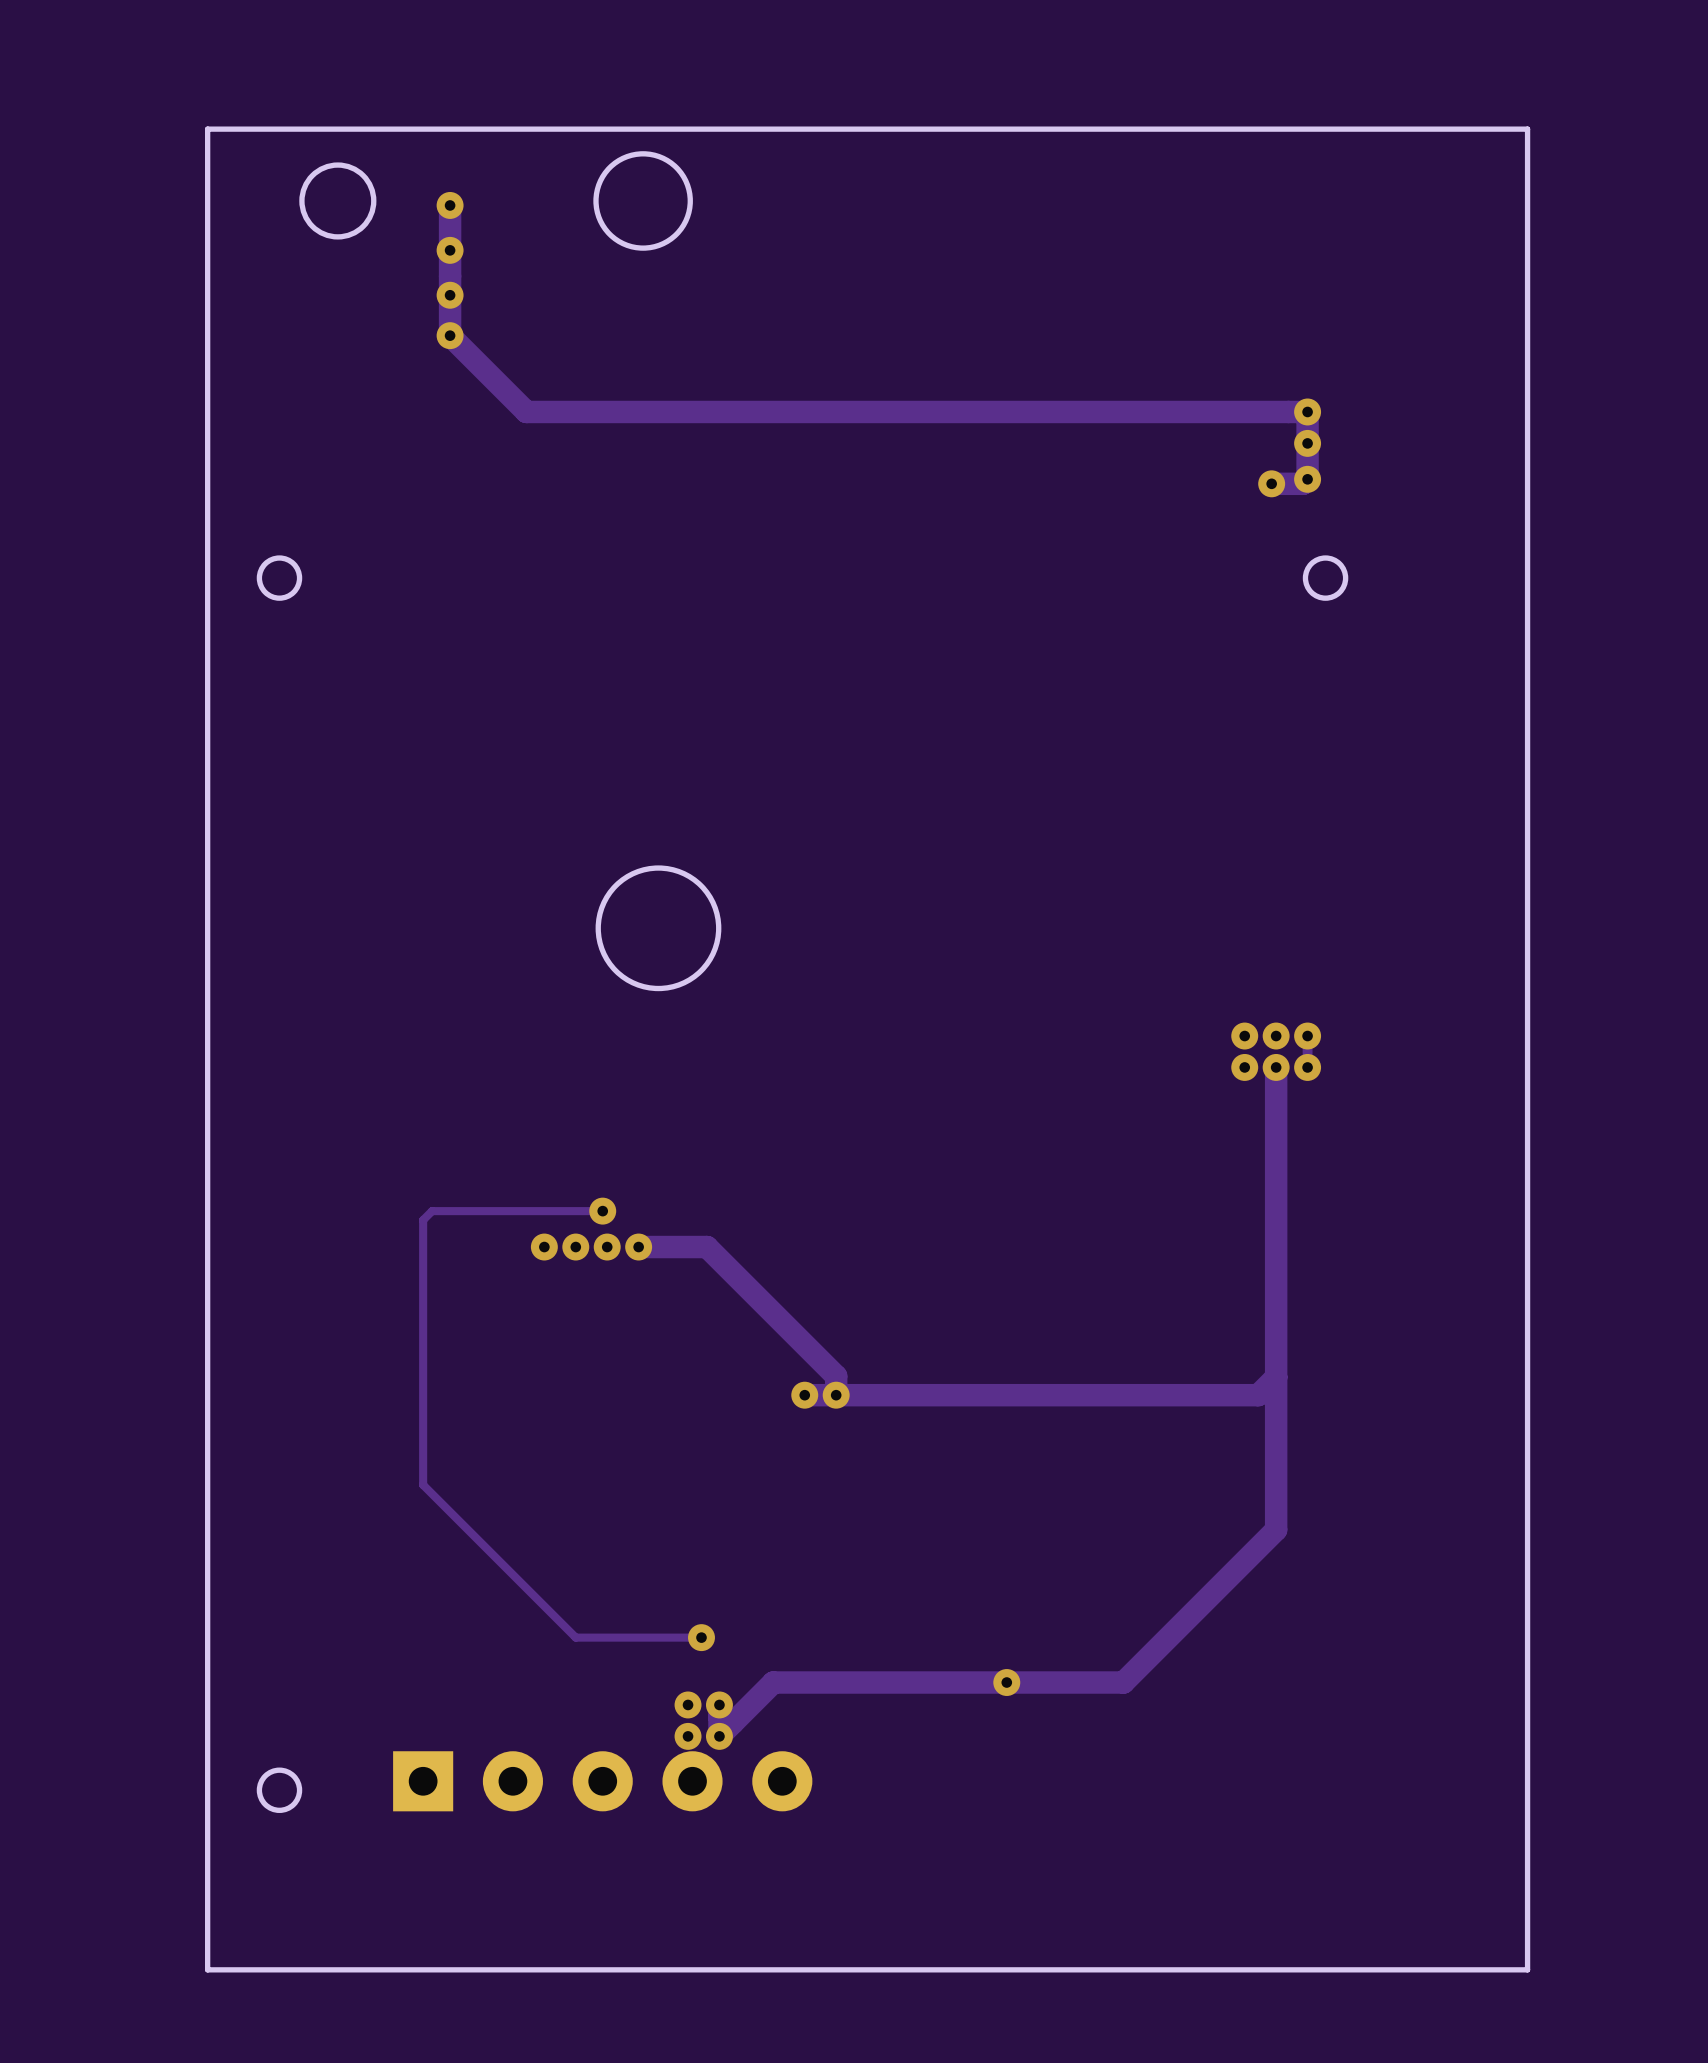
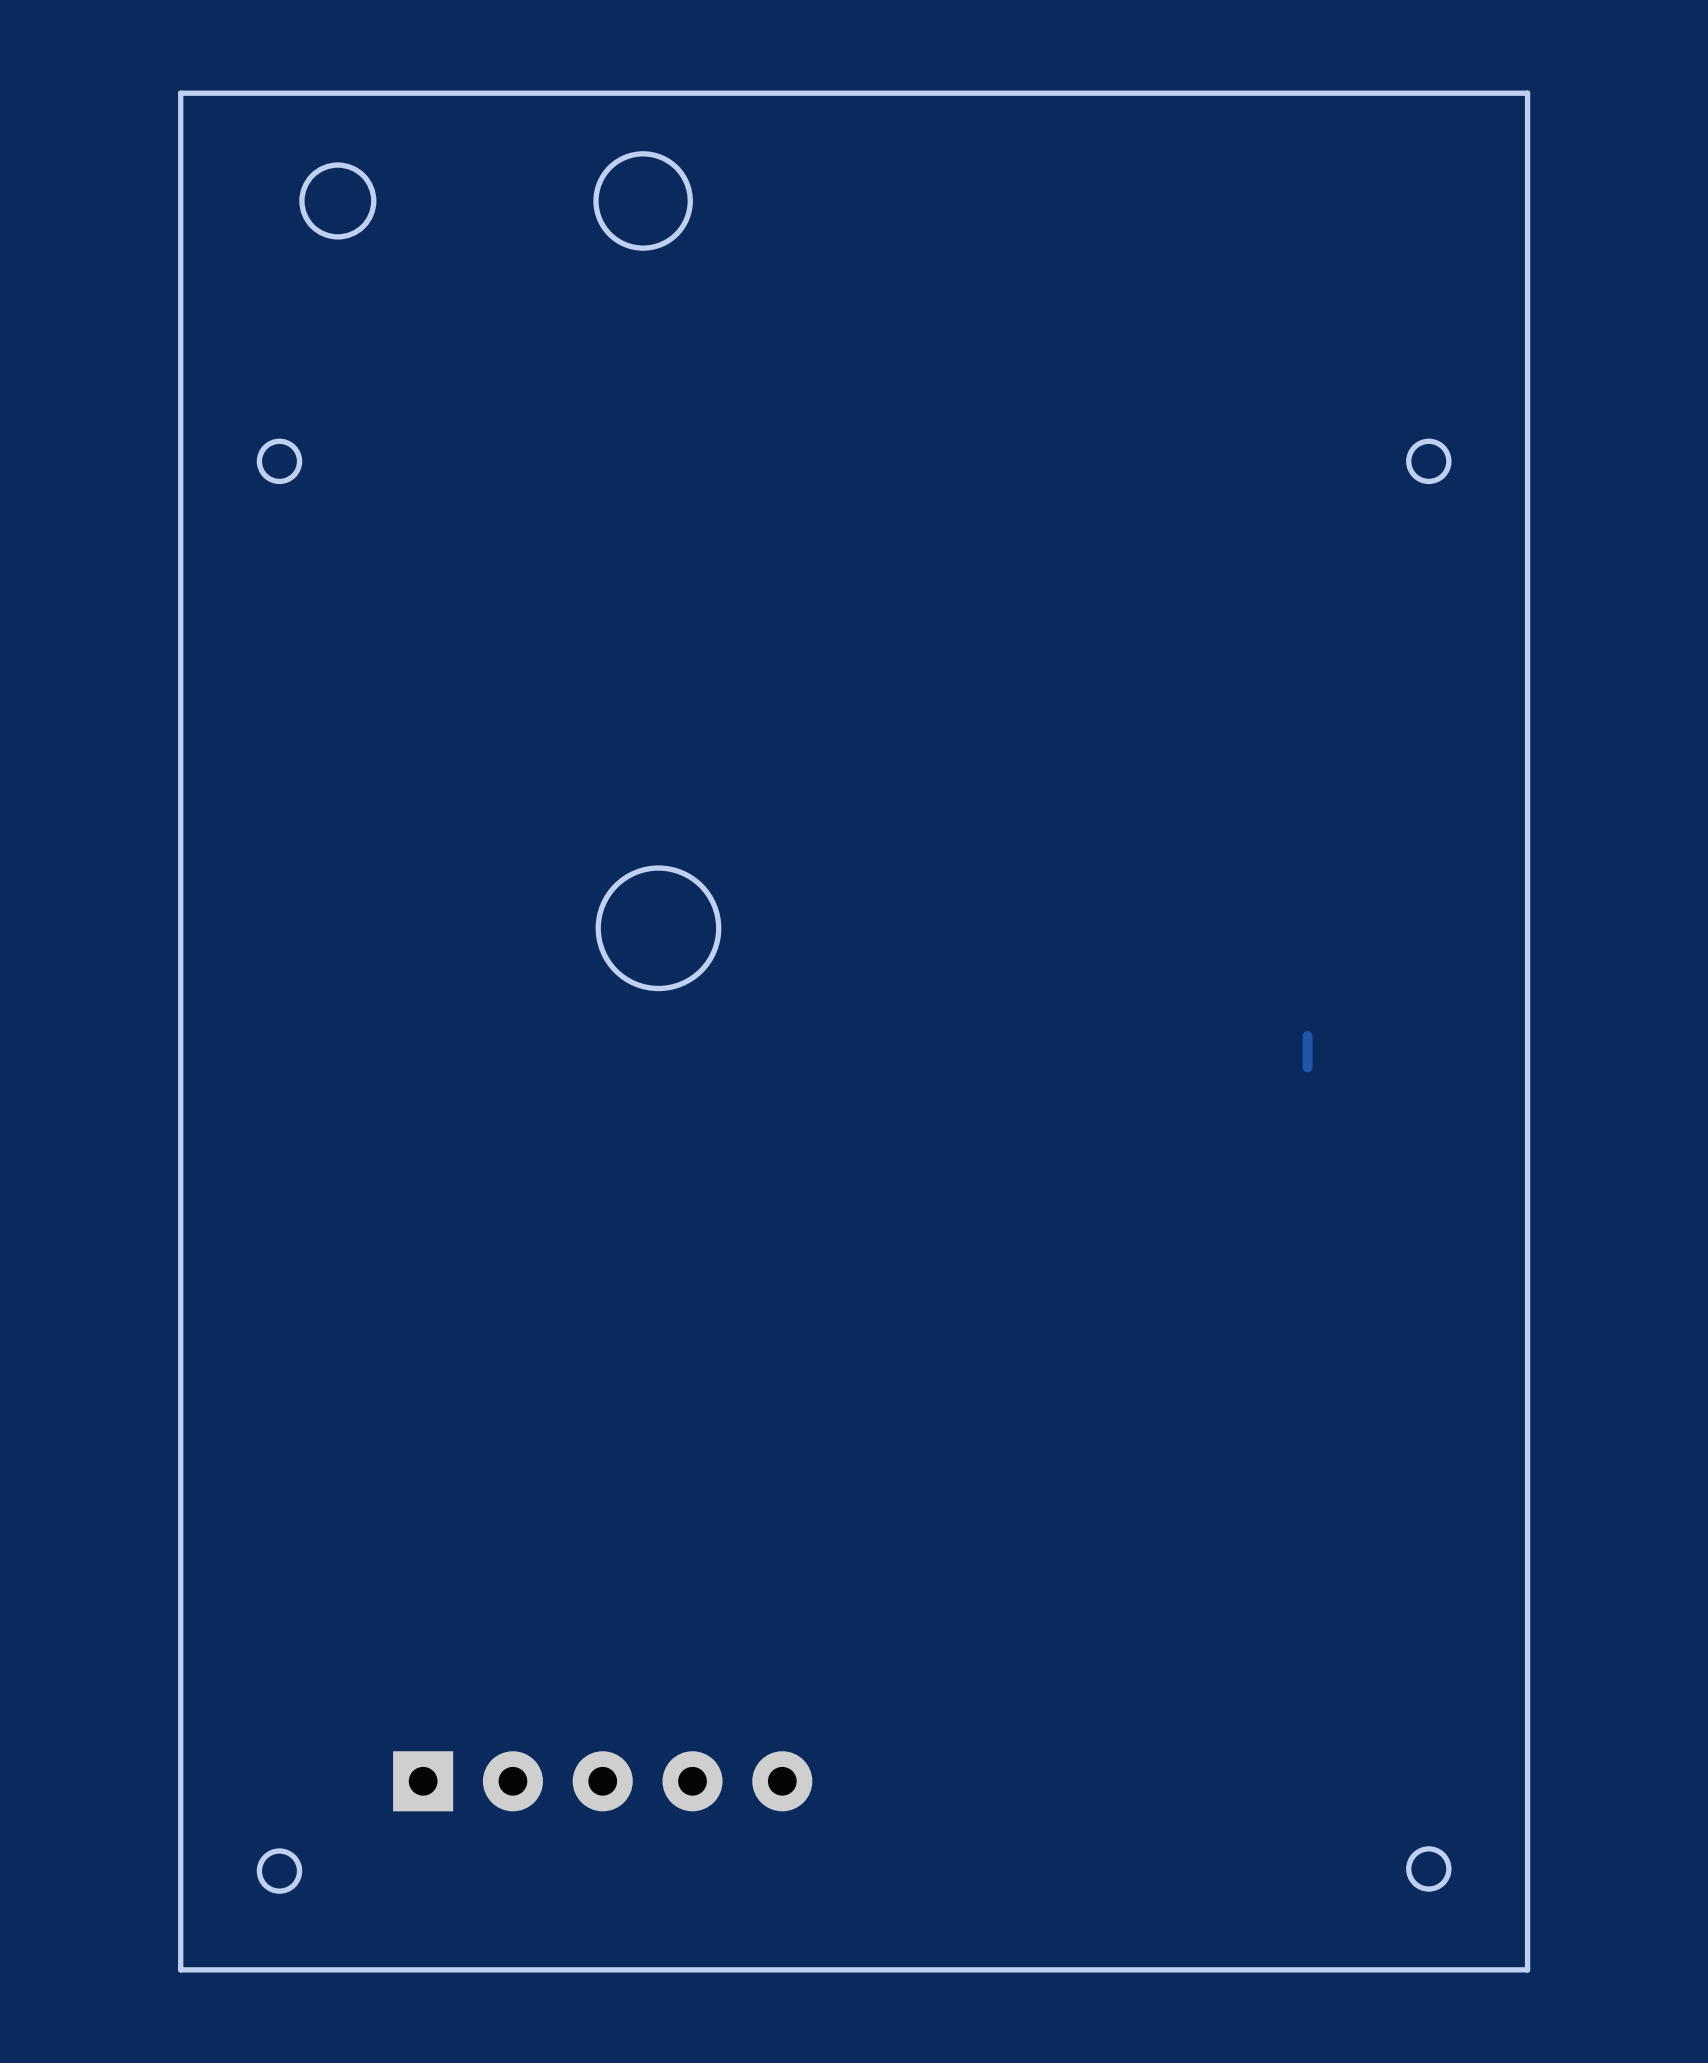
board edge: (1527, 129) (207, 129) (207, 1969) -> (1527, 129) (1527, 93) (180, 93) (180, 1969) (207, 1969)
track: (450, 205) (450, 335) (526, 411) (1307, 411) (1307, 479) (1303, 483) (1271, 483) -> none
via: (450, 205) -> none
via: (450, 250) -> none
via: (450, 295) -> none
via: (450, 335) -> none
via: (1307, 411) -> none
via: (1307, 443) -> none
via: (1307, 479) -> none
via: (1271, 483) -> none
round board edge position: (279, 578) -> (279, 461)
round board edge position: (1325, 578) -> (1428, 461)
via: (1244, 1036) -> none
via: (1276, 1036) -> none
via: (1307, 1036) -> none
via: (1244, 1067) -> none
track: (1276, 1067) (1276, 1529) (1123, 1682) (773, 1682) (719, 1736) (719, 1704) -> none
via: (1276, 1067) -> none
via: (1307, 1067) -> none
track: (602, 1211) (432, 1211) (423, 1220) (423, 1484) (575, 1637) (701, 1637) -> none
via: (602, 1211) -> none
via: (544, 1247) -> none
via: (575, 1247) -> none
via: (607, 1247) -> none
track: (638, 1247) (707, 1247) (836, 1376) (836, 1395) -> none
via: (638, 1247) -> none
track: (1276, 1377) (1258, 1395) (804, 1395) -> none
via: (804, 1395) -> none
via: (836, 1395) -> none
via: (701, 1637) -> none
via: (1006, 1682) -> none
via: (688, 1704) -> none
via: (719, 1704) -> none
via: (688, 1736) -> none
via: (719, 1736) -> none
round board edge position: (279, 1790) -> (279, 1871)
round board edge: none -> [1406, 1846, 1452, 1892]

